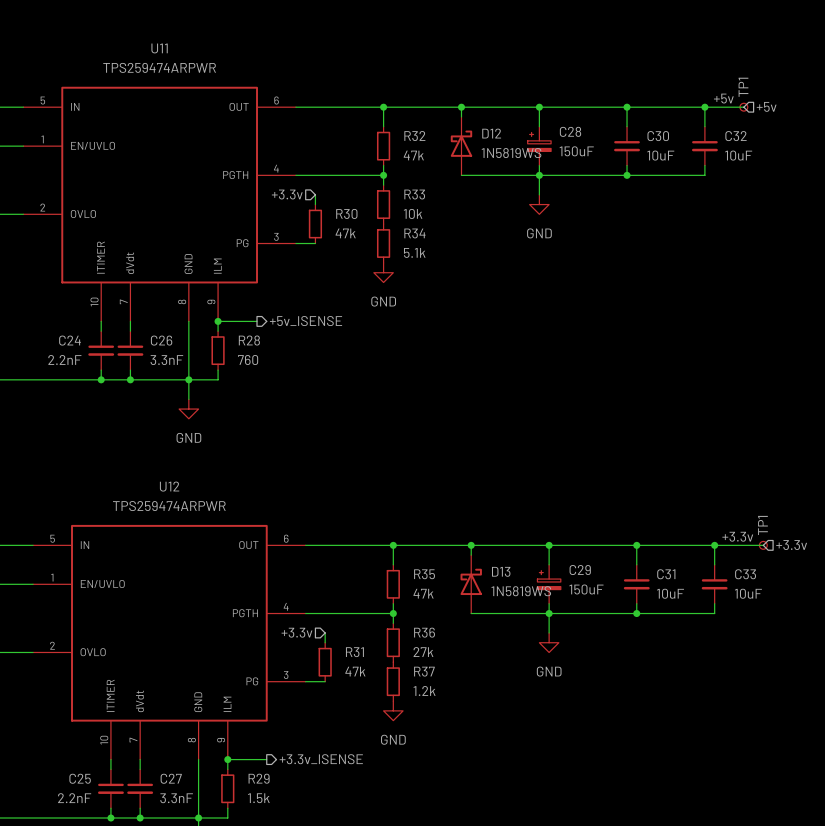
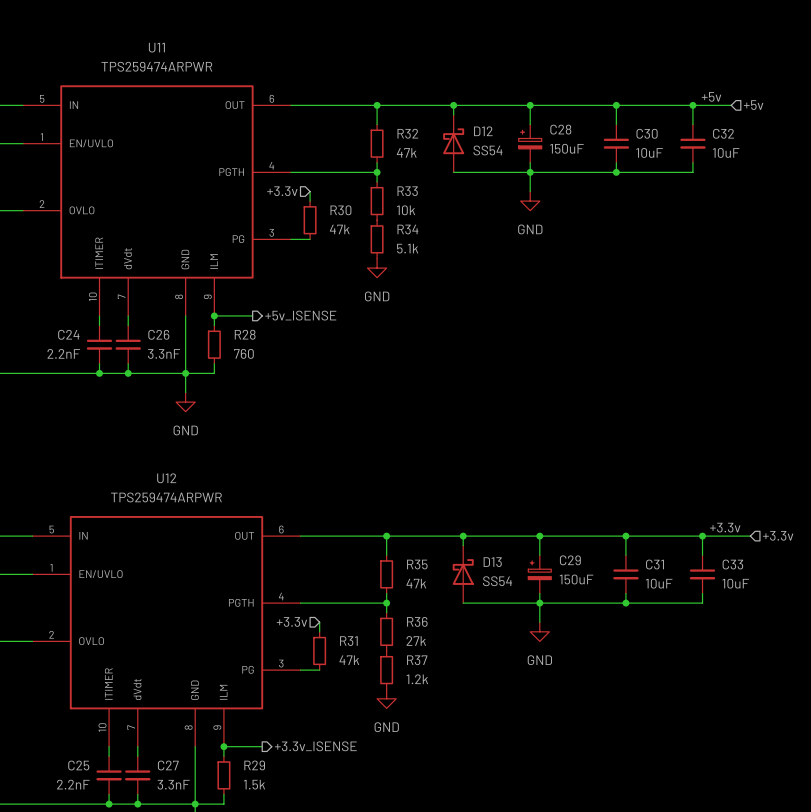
TP1: (743, 107) -> none
D12 value: 1N5819WS (511, 153) -> SS54 (488, 150)
TP1: (763, 545) -> none
D13 value: 1N5819WS (521, 591) -> SS54 (497, 581)

